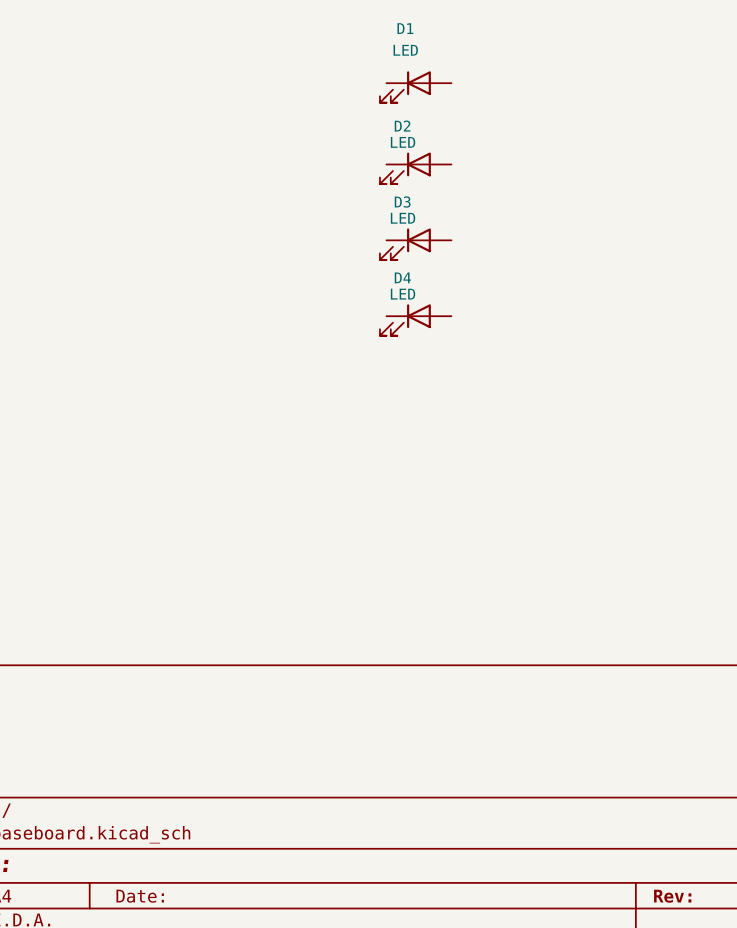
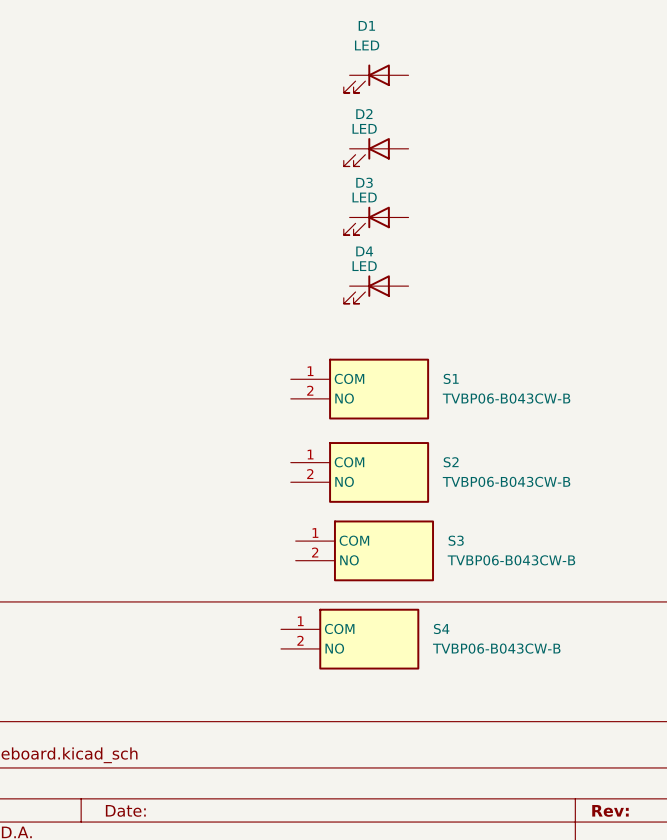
S1: none -> TVBP06-B043CW-B (359, 389)
S2: none -> TVBP06-B043CW-B (359, 472)
S3: none -> TVBP06-B043CW-B (364, 550)
S4: none -> TVBP06-B043CW-B (350, 639)

